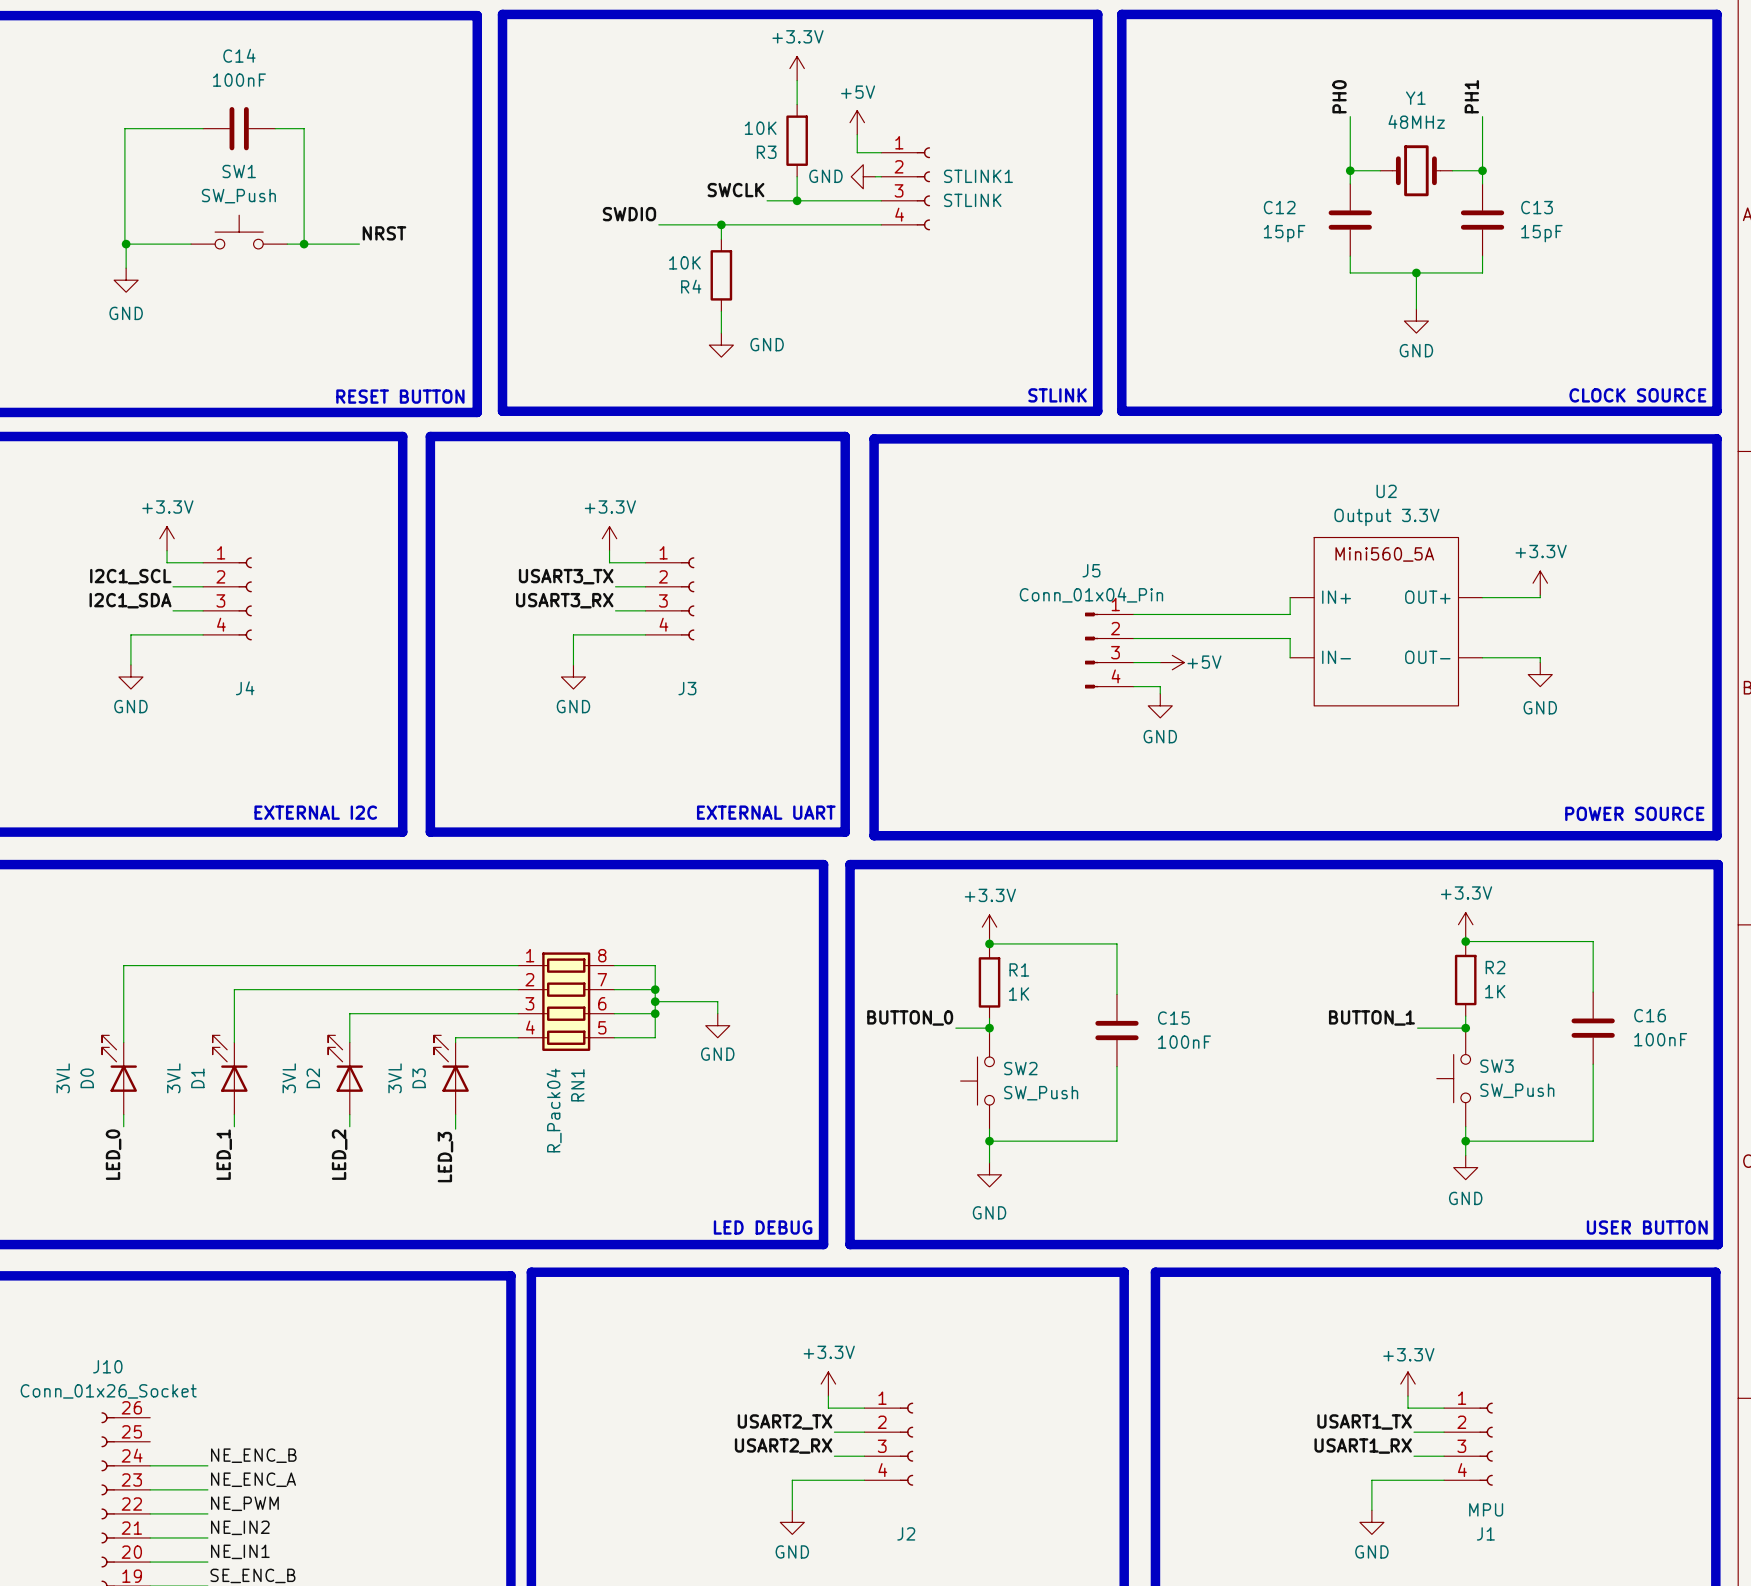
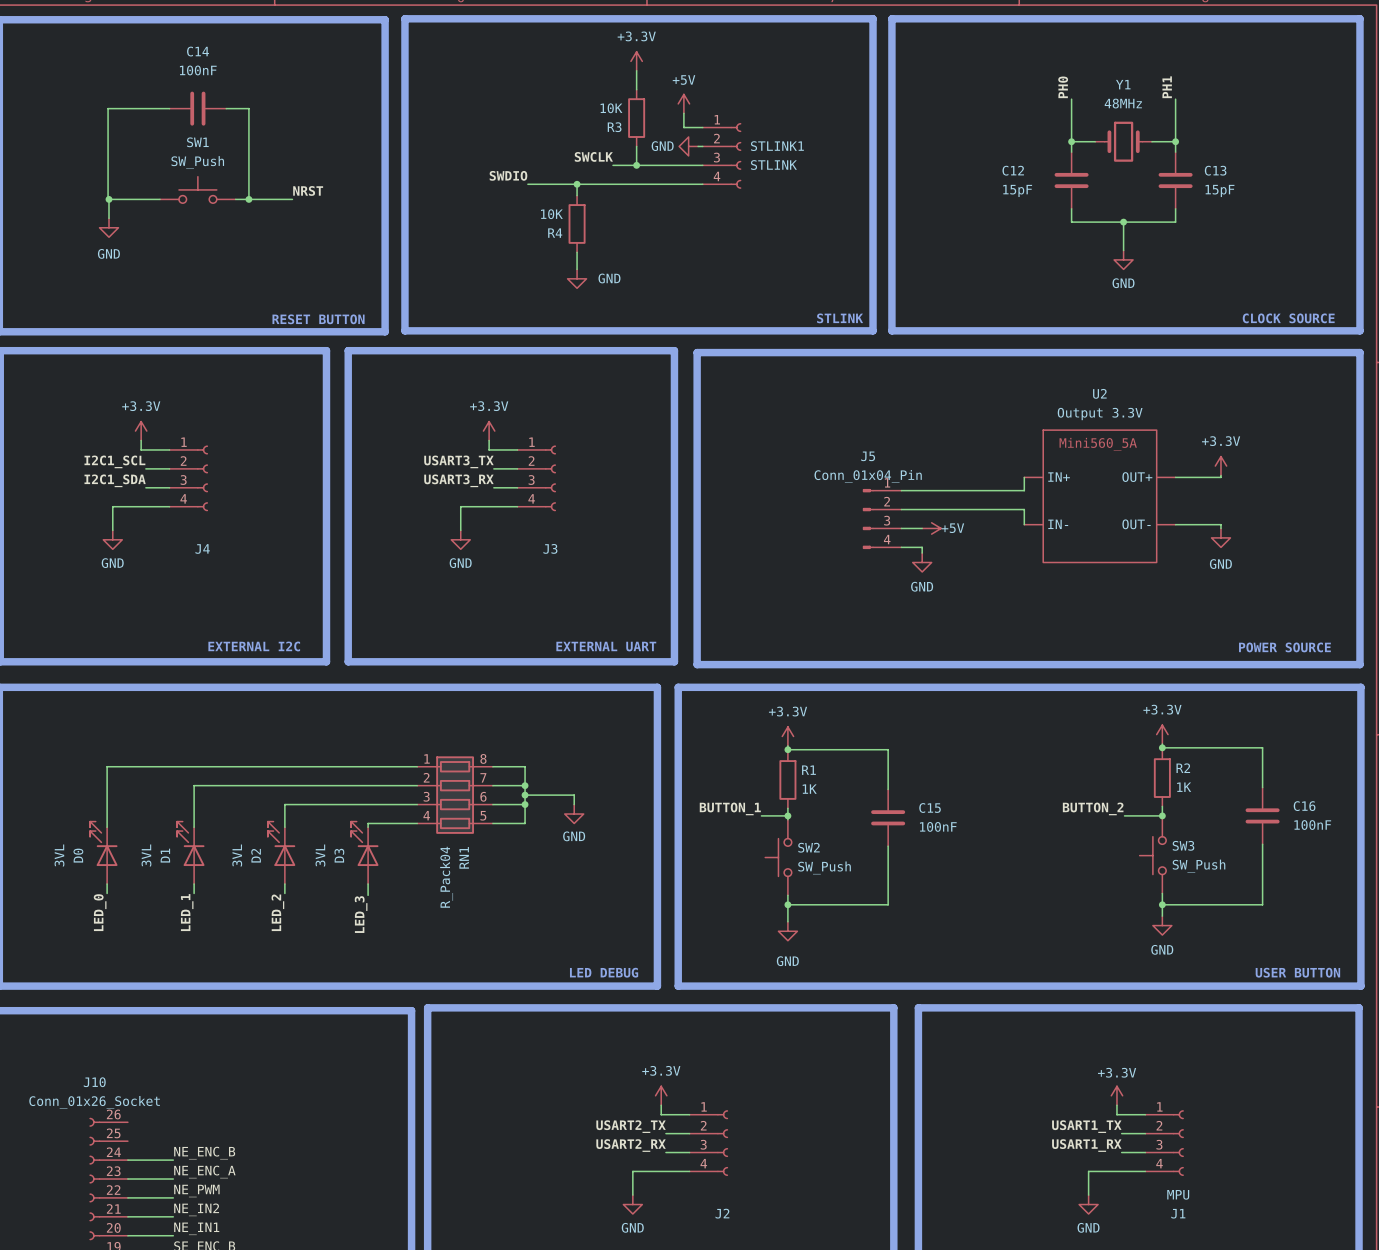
label: BUTTON_0 (910, 1017) -> BUTTON_1 (730, 808)
label: BUTTON_1 (1371, 1017) -> BUTTON_2 (1093, 808)

